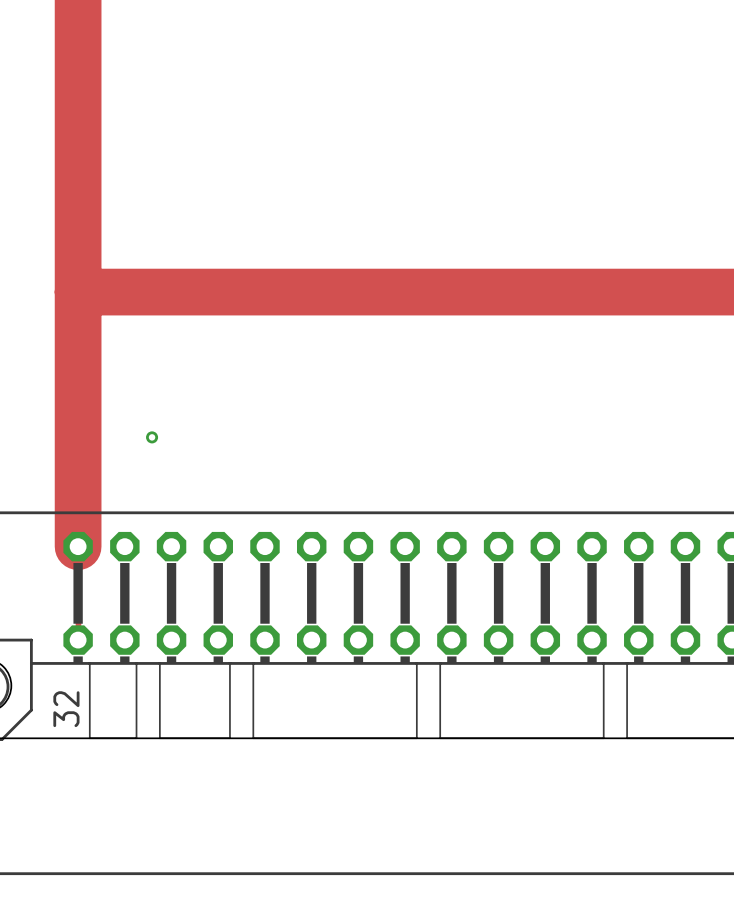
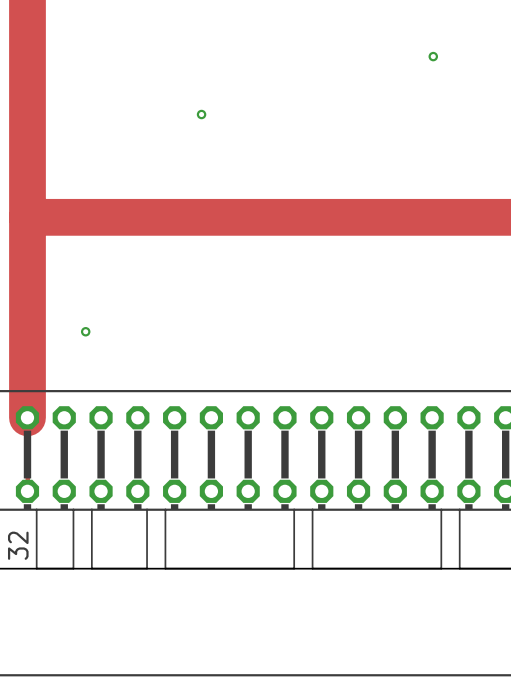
via: none -> (433, 56)
via: none -> (201, 114)

